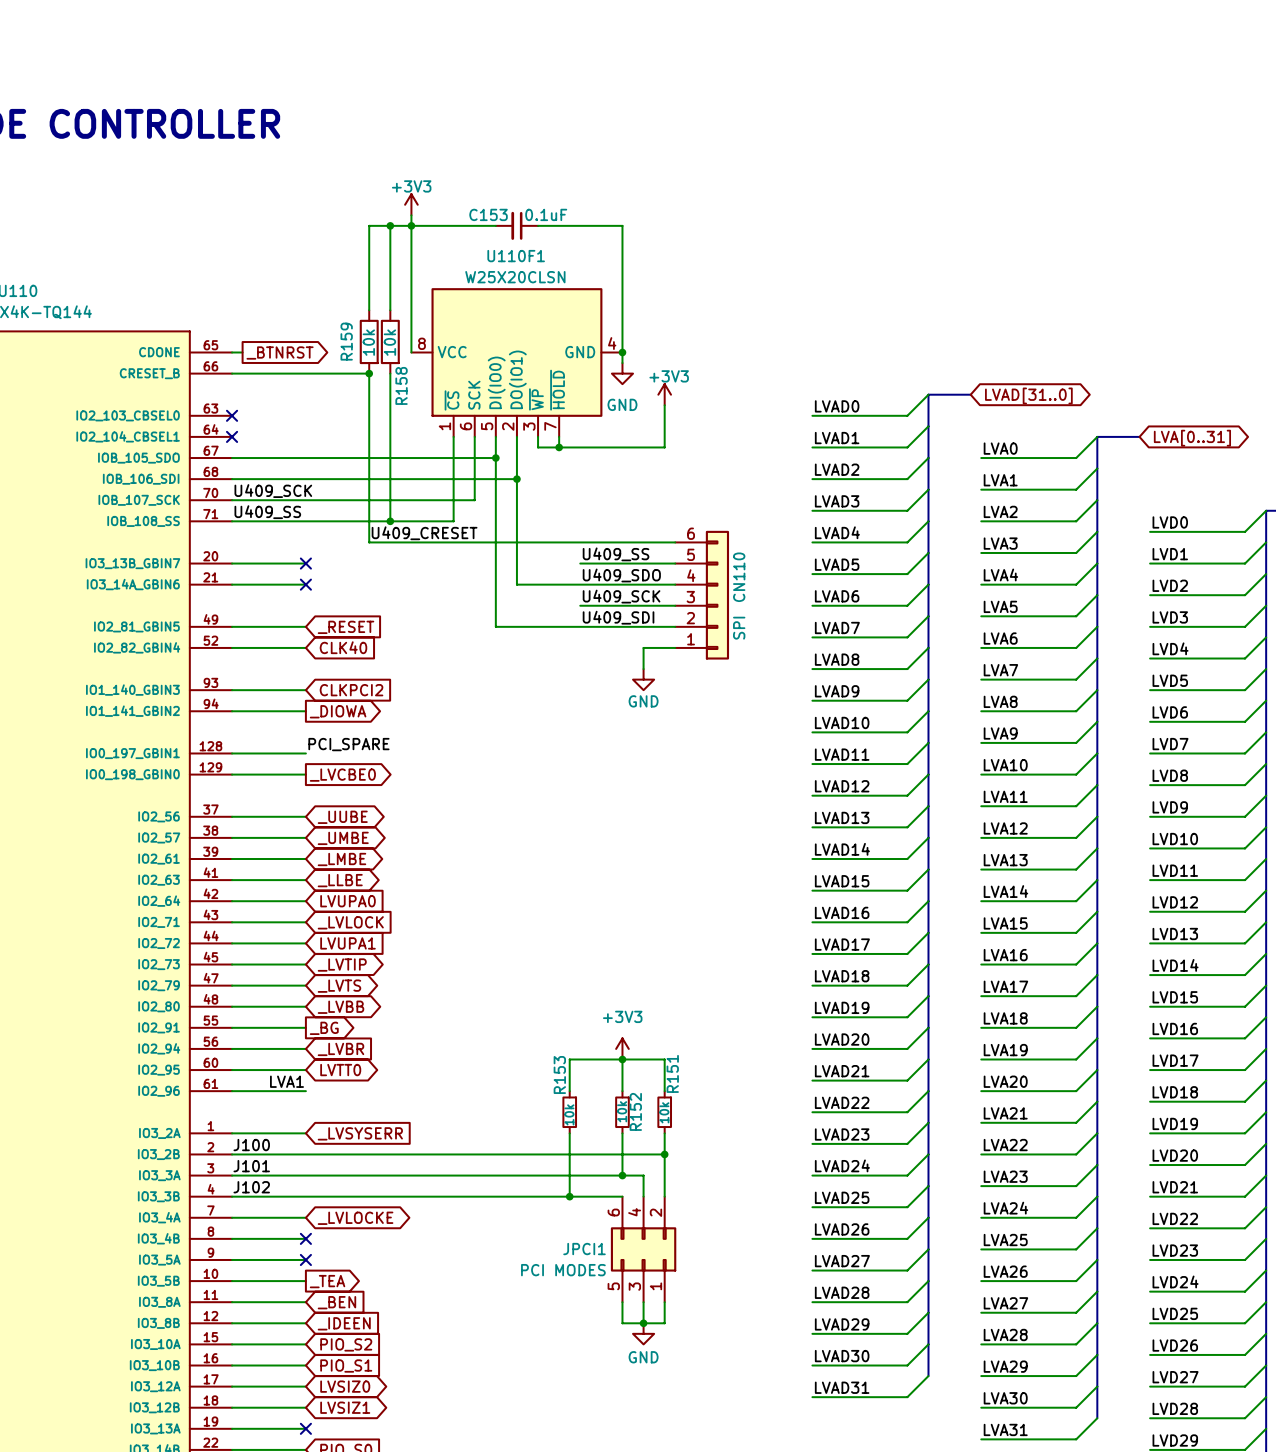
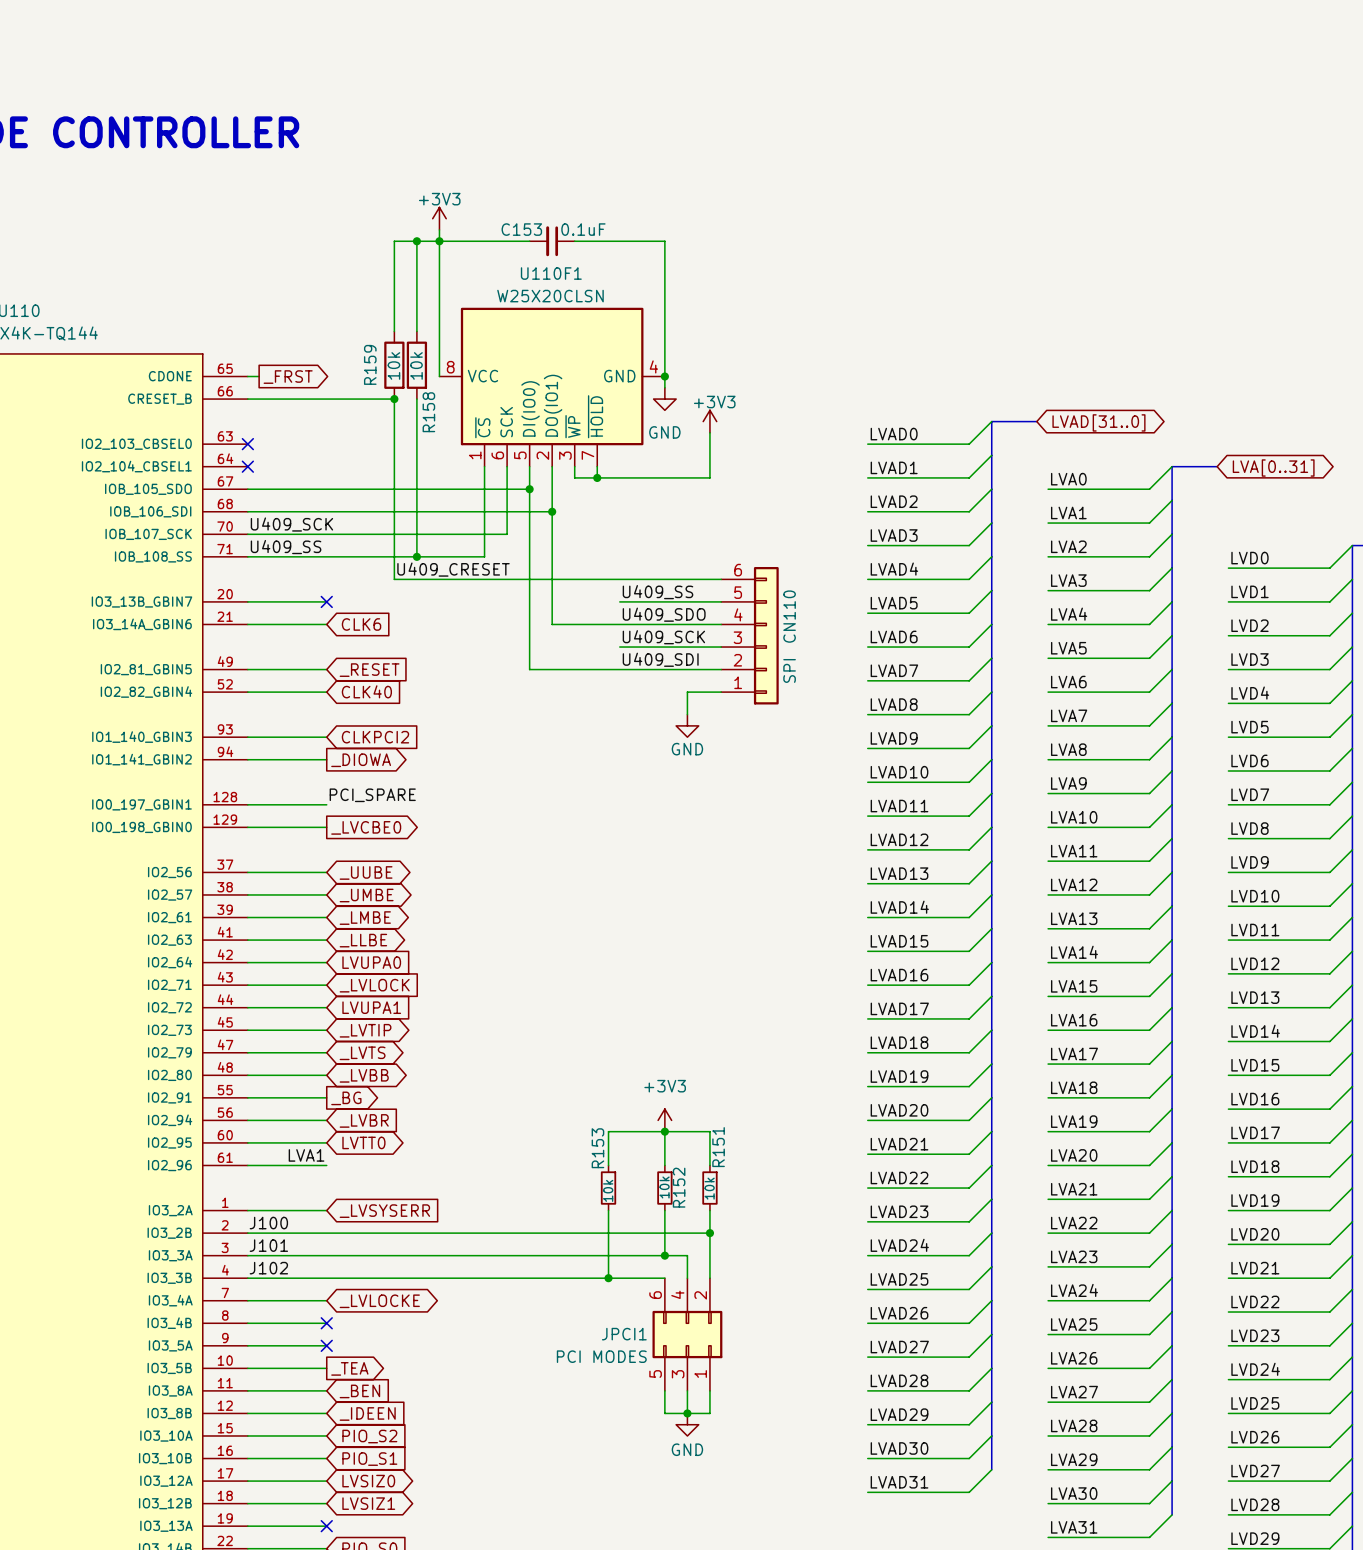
global label: _BTNRST (280, 353) -> _FRST (288, 377)
no-connect mark: (305, 584) -> none
global label: none -> CLK6 (361, 624)

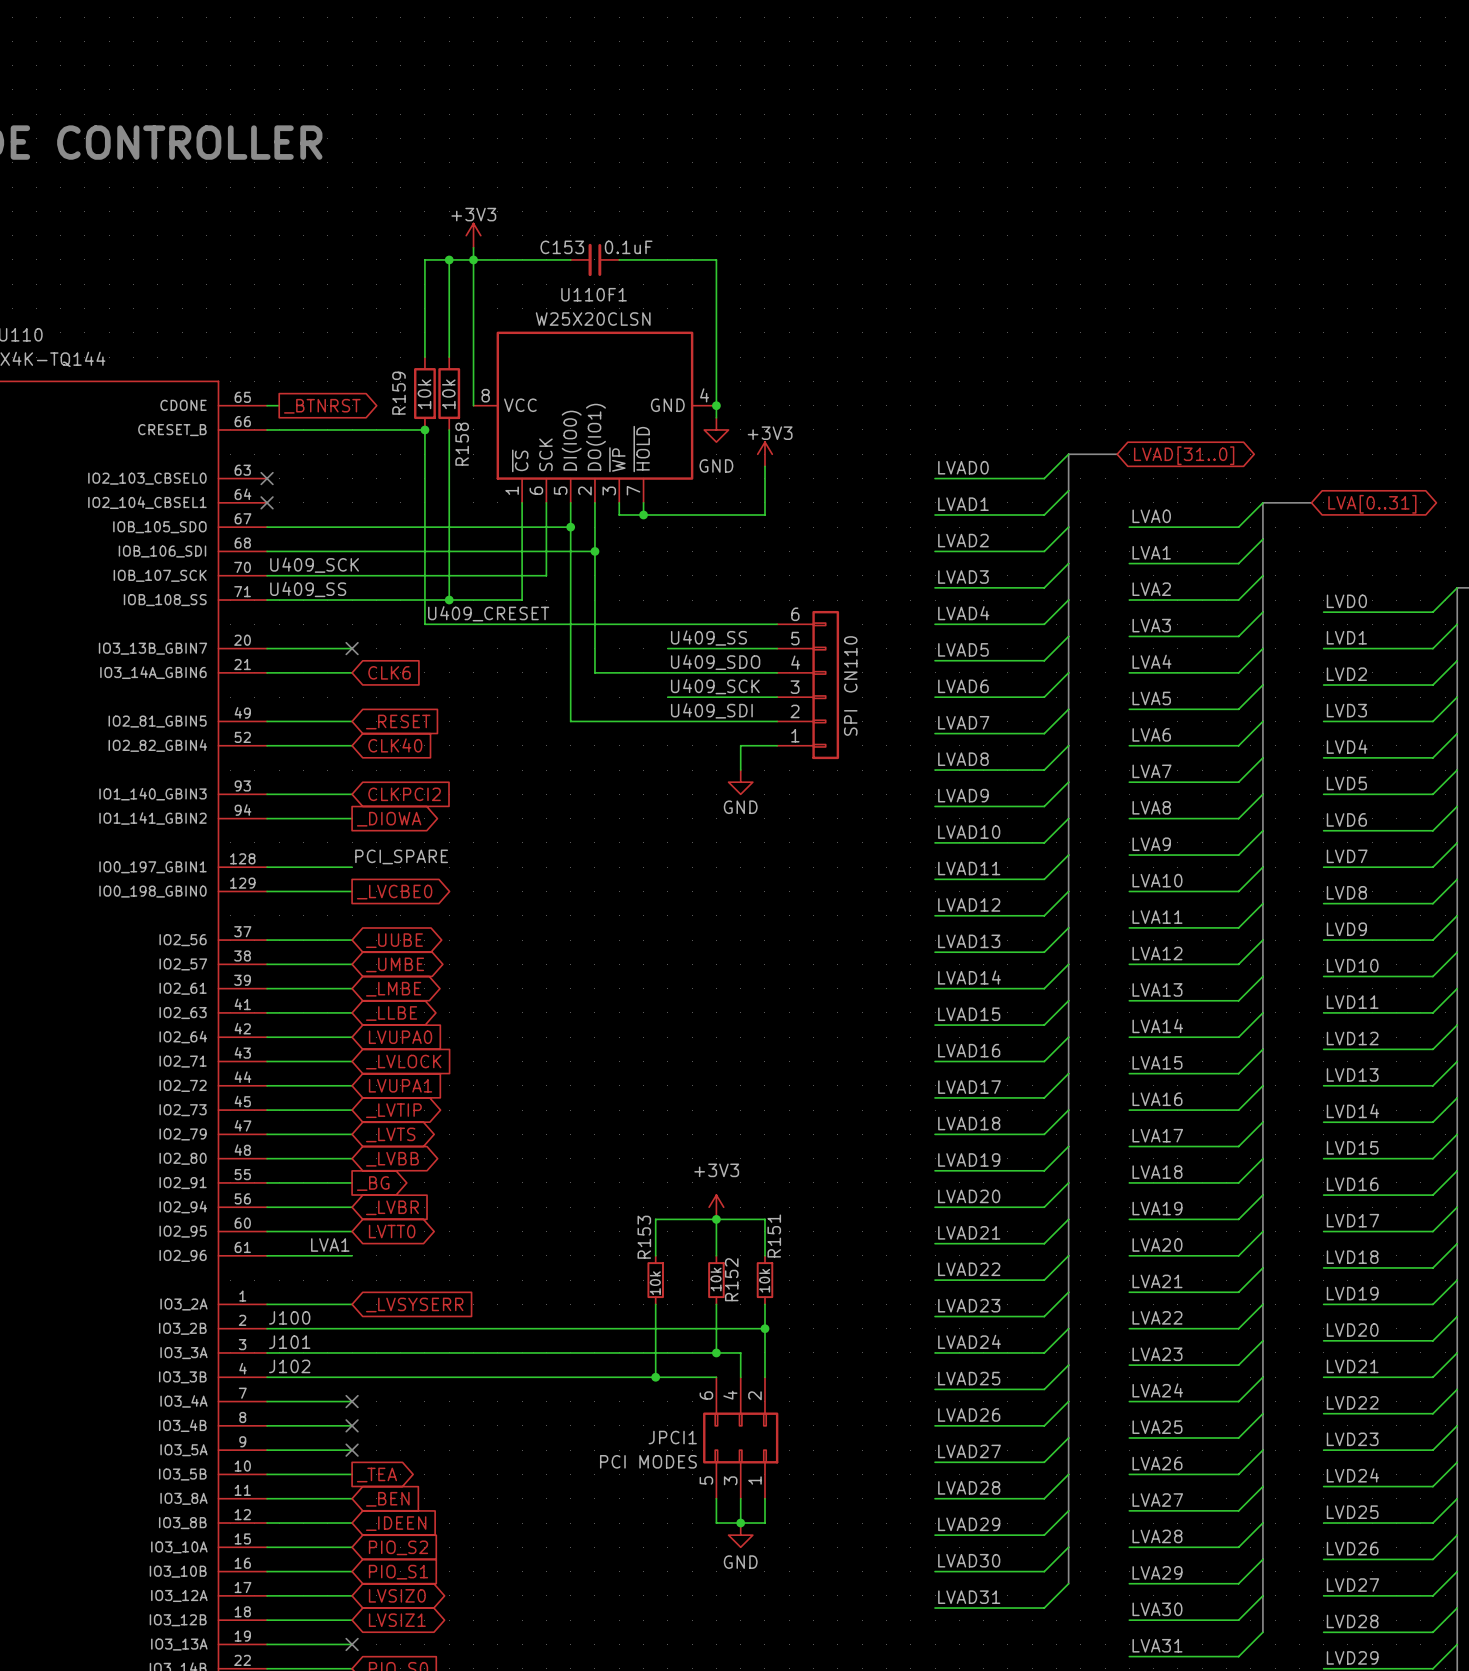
global label: _FRST (288, 377) -> _BTNRST (322, 406)
no-connect mark: none -> (352, 1401)
global label: _LVLOCKE (379, 1301) -> none

